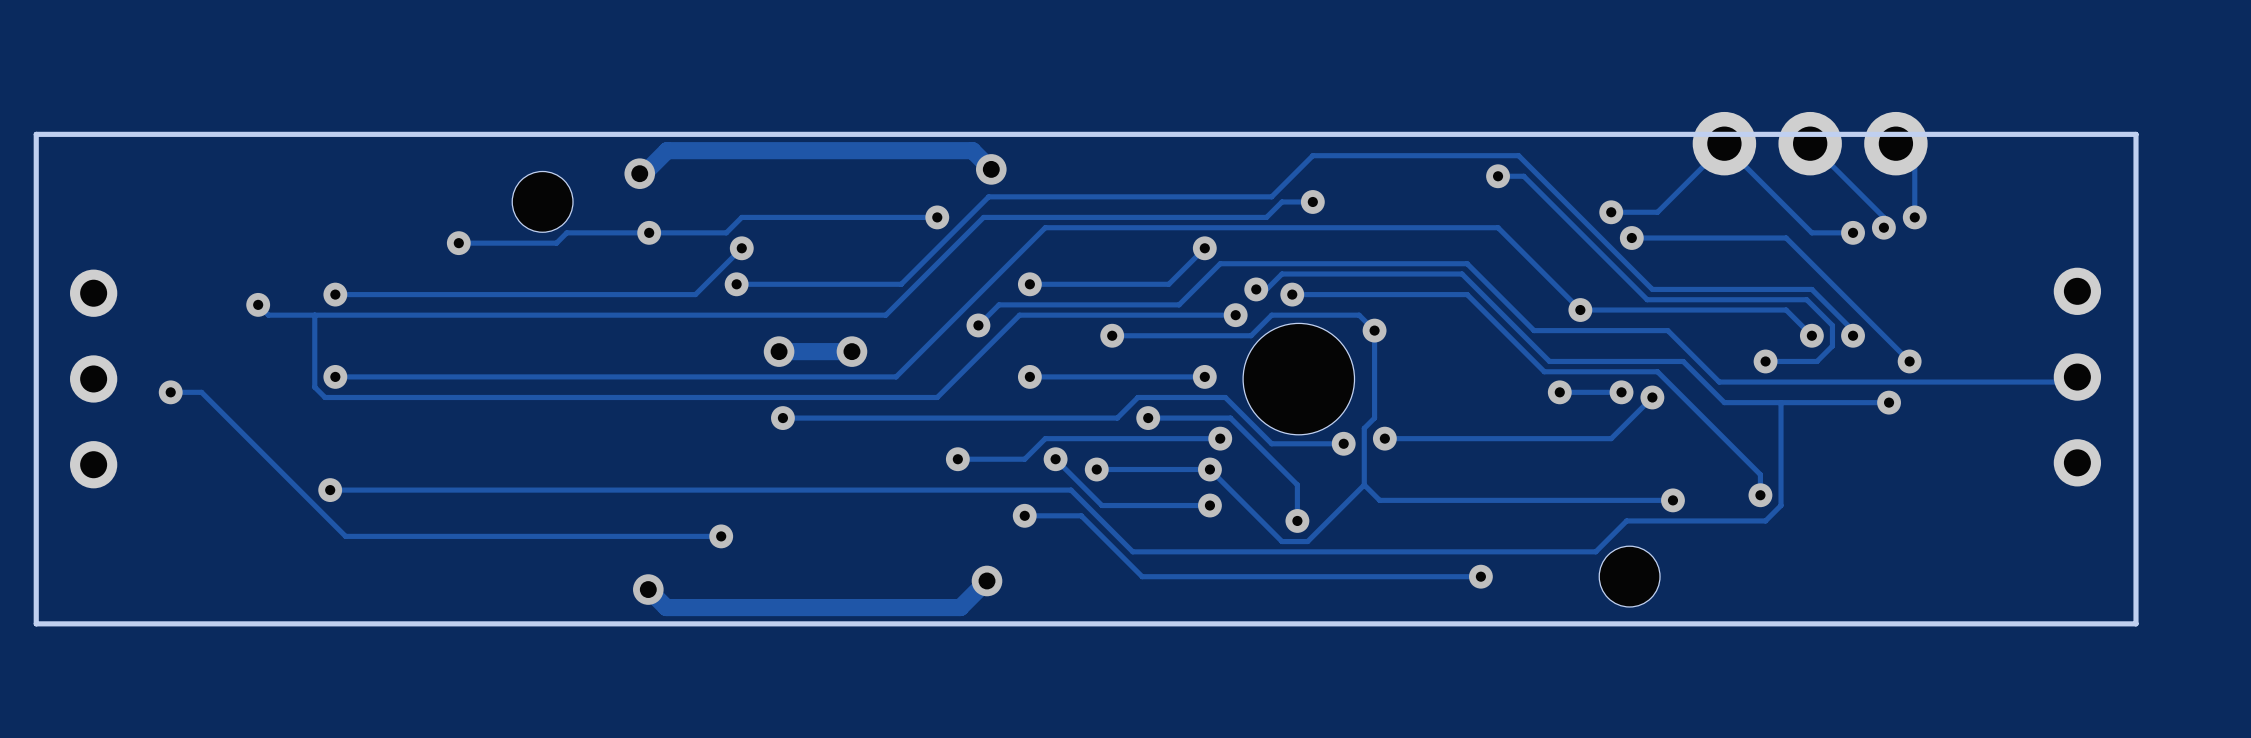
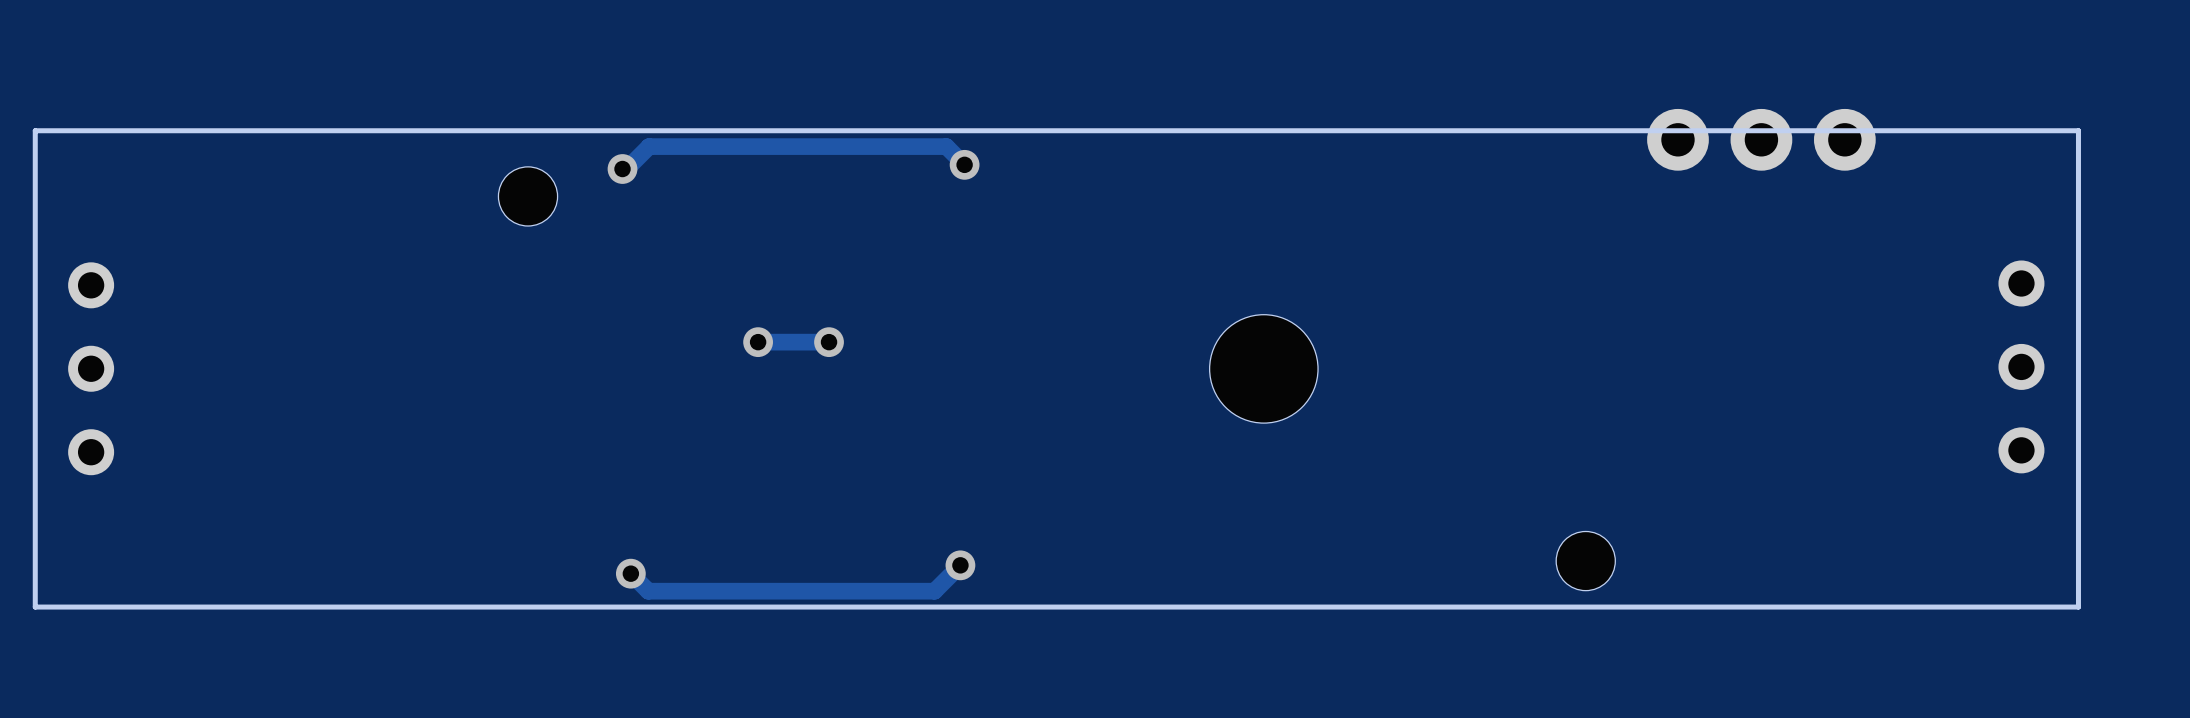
track: (1810, 143) (1883, 217) (1883, 227) -> none
track: (1895, 143) (1914, 160) (1914, 217) -> none
track: (1724, 145) (1811, 232) (1853, 232) -> none
track: (1724, 145) (1657, 212) (1611, 212) -> none
track: (1498, 176) (1523, 176) (1647, 299) (1806, 299) (1832, 325) (1832, 346) (1817, 361) (1765, 361) -> none
via: (1498, 176) -> none
track: (1312, 201) (1281, 201) (1266, 217) (983, 217) (885, 315) (268, 315) (258, 304) -> none
via: (1312, 201) -> none
via: (1611, 212) -> none
track: (937, 217) (741, 217) (726, 232) (566, 232) (556, 243) (458, 243) -> none
via: (937, 217) -> none
via: (1914, 217) -> none
via: (1883, 227) -> none
via: (649, 232) -> none
via: (1853, 232) -> none
track: (1631, 238) (1786, 238) (1909, 361) -> none
via: (1631, 238) -> none
via: (458, 243) -> none
track: (741, 248) (695, 294) (335, 294) -> none
via: (741, 248) -> none
track: (1204, 248) (1168, 284) (1029, 284) -> none
via: (1204, 248) -> none
track: (736, 284) (901, 284) (988, 196) (1271, 196) (1312, 155) (1518, 155) (1652, 289) (1811, 289) (1853, 330) (1853, 335) -> none
via: (736, 284) -> none
via: (1029, 284) -> none
track: (1256, 289) (1266, 289) (1281, 274) (1462, 274) (1549, 361) (1683, 361) (1724, 402) (1889, 402) -> none
via: (1256, 289) -> none
via: (335, 294) -> none
track: (1292, 294) (1467, 294) (1544, 371) (1657, 371) (1760, 474) (1760, 495) -> none
via: (1292, 294) -> none
via: (258, 304) -> none
via: (1580, 310) -> none
track: (1235, 315) (1019, 315) (937, 397) (325, 397) (314, 387) (314, 315) -> none
via: (1235, 315) -> none
track: (978, 325) (999, 304) (1179, 304) (1220, 263) (1467, 263) (1534, 330) (1667, 330) (1719, 382) (2074, 382) (2077, 377) -> none
via: (978, 325) -> none
via: (1374, 330) -> none
track: (1112, 335) (1251, 335) (1271, 315) (1359, 315) (1374, 330) (1374, 418) (1364, 428) (1364, 484) -> none
via: (1112, 335) -> none
track: (1811, 335) (1786, 310) (1580, 310) (1498, 227) (1045, 227) (896, 376) (335, 376) -> none
via: (1811, 335) -> none
via: (1853, 335) -> none
via: (1765, 361) -> none
via: (1909, 361) -> none
via: (335, 376) -> none
via: (1029, 376) -> none
track: (1204, 376) (1029, 376) -> none
via: (1204, 376) -> none
track: (170, 392) (201, 392) (345, 536) (721, 536) -> none
via: (170, 392) -> none
via: (1559, 392) -> none
track: (1621, 392) (1559, 392) -> none
via: (1621, 392) -> none
track: (1652, 397) (1611, 438) (1384, 438) -> none
via: (1652, 397) -> none
track: (1781, 402) (1781, 505) (1765, 520) (1626, 520) (1595, 551) (1132, 551) (1071, 490) (330, 490) -> none
via: (1889, 402) -> none
track: (782, 418) (1117, 418) (1137, 397) (1225, 397) (1271, 443) (1343, 443) -> none
via: (782, 418) -> none
track: (1148, 418) (1230, 418) (1297, 484) (1297, 520) -> none
via: (1148, 418) -> none
track: (1220, 438) (1045, 438) (1024, 459) (957, 459) -> none
via: (1220, 438) -> none
via: (1384, 438) -> none
via: (1343, 443) -> none
via: (957, 459) -> none
track: (1055, 459) (1101, 505) (1209, 505) -> none
via: (1055, 459) -> none
track: (1096, 469) (1209, 469) (1281, 541) (1307, 541) (1364, 484) -> none
via: (1096, 469) -> none
via: (1209, 469) -> none
track: (1364, 484) (1379, 500) (1672, 500) -> none
via: (330, 490) -> none
via: (1760, 495) -> none
via: (1672, 500) -> none
via: (1209, 505) -> none
track: (1024, 515) (1081, 515) (1142, 576) (1480, 576) -> none
via: (1024, 515) -> none
via: (1297, 520) -> none
via: (721, 536) -> none
via: (1480, 576) -> none

